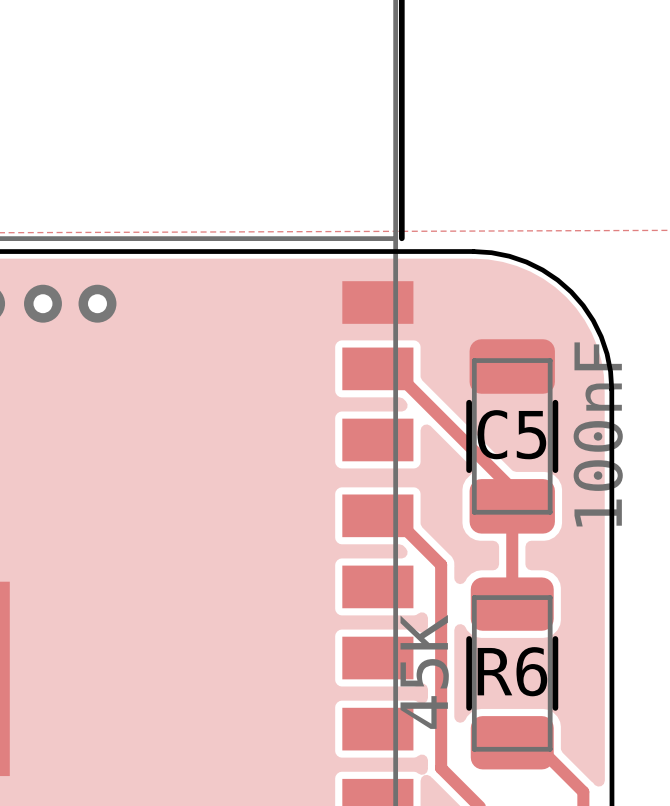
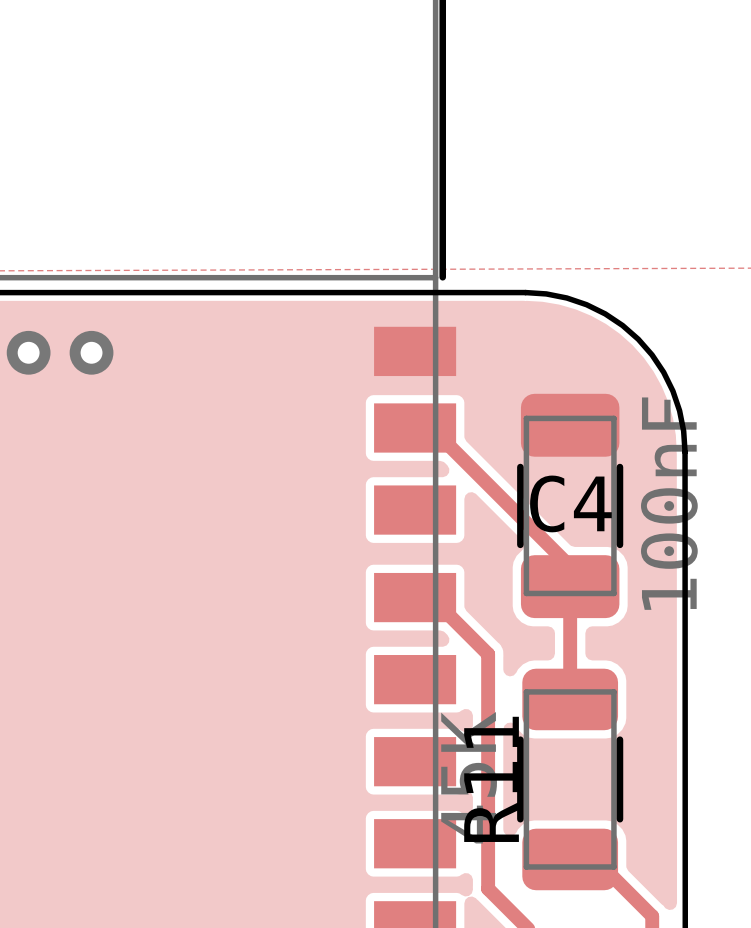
C5 name: C5 (511, 434) -> C4 (570, 503)
R6 name: R6 (512, 671) -> R11 (491, 779)

